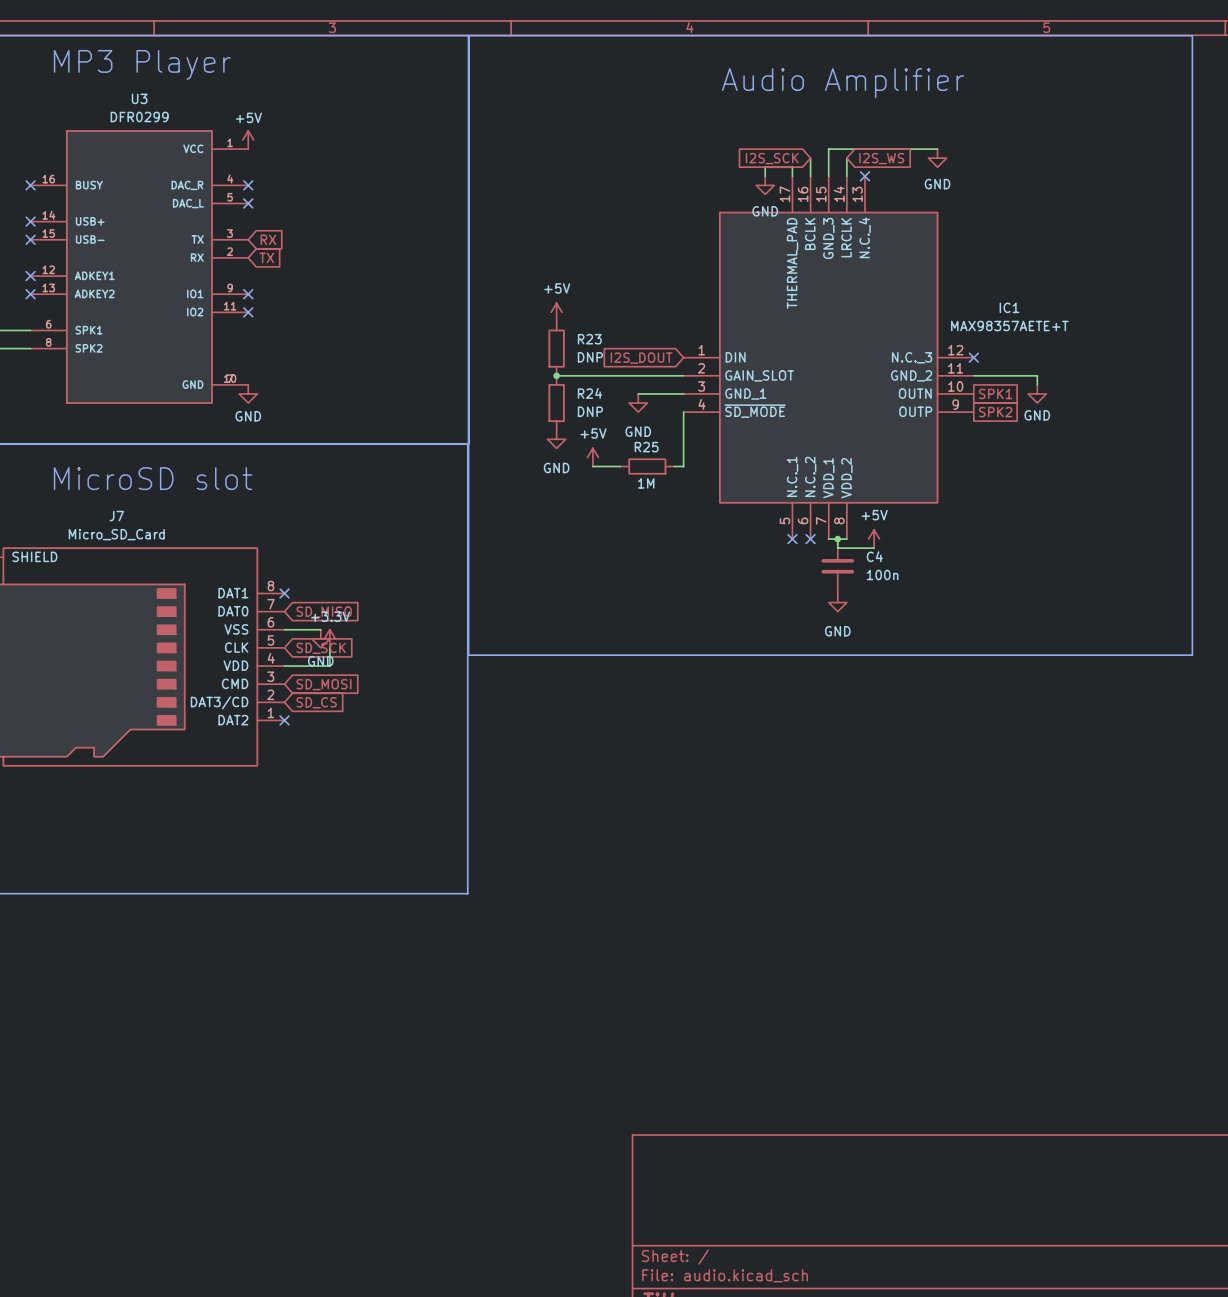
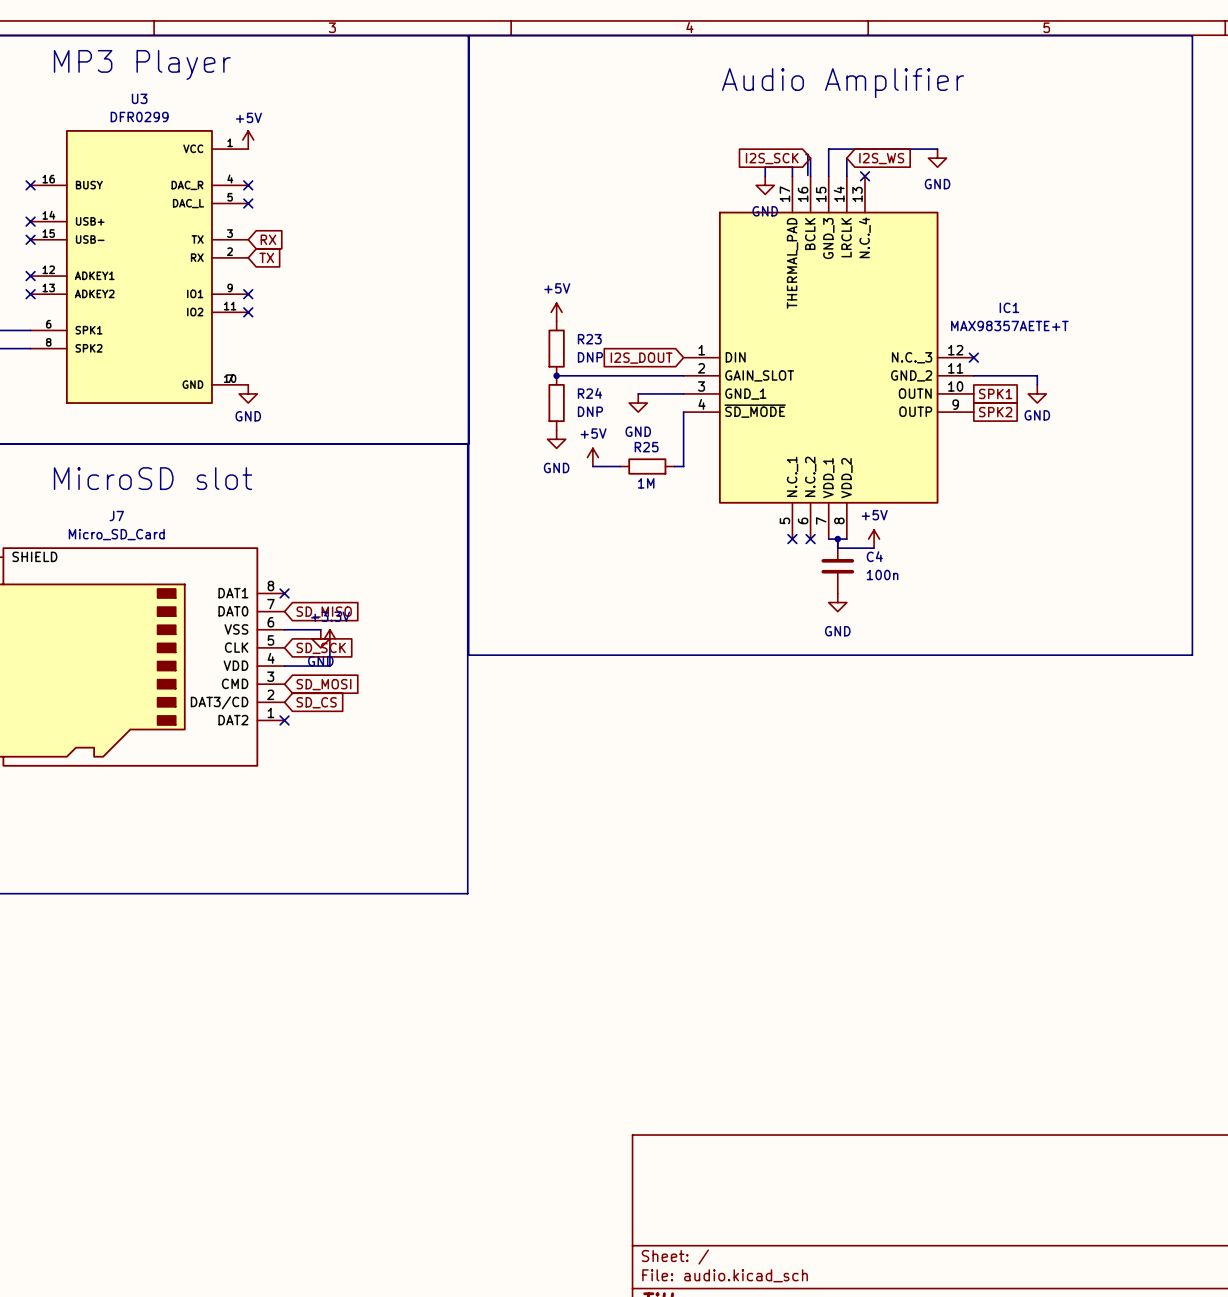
wire: none -> (806, 154) (807, 154) (807, 175)

